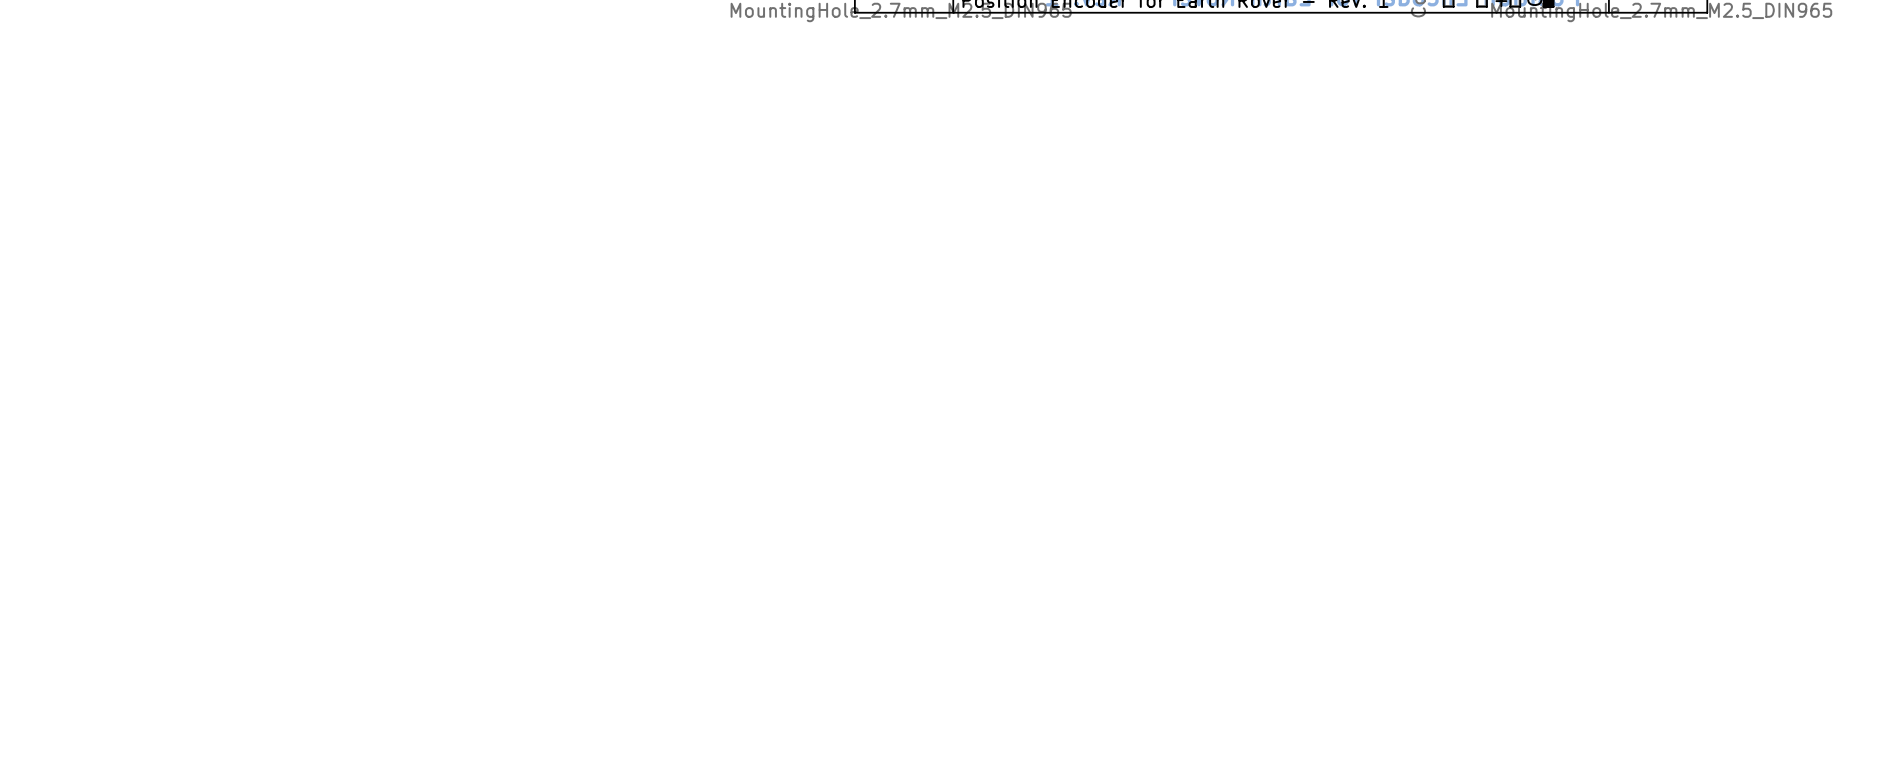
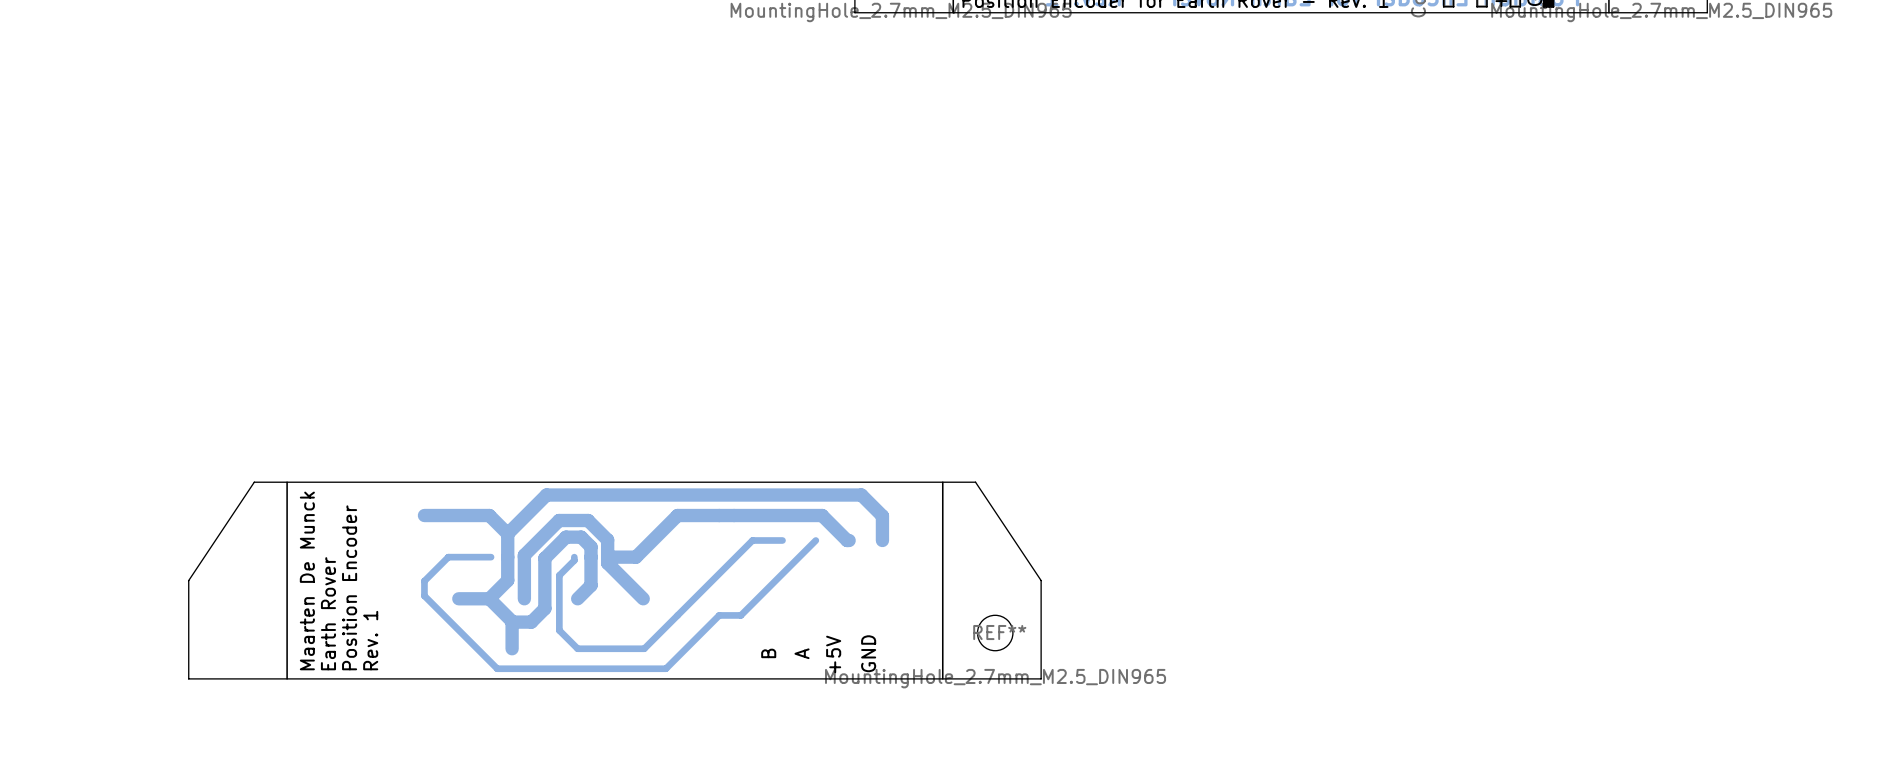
board edge: none -> (254, 482) (975, 482) (1041, 580) (1041, 678) (188, 678) (188, 580) (254, 482)
line: none -> (287, 482) (287, 678)
line: none -> (942, 482) (942, 678)
bottom track: none -> (424, 515) (489, 515) (507, 533)
bottom track: none -> (507, 533) (507, 580) (489, 598)
bottom track: none -> (507, 533) (546, 495) (861, 495) (882, 516) (882, 540)
bottom track: none -> (782, 540) (752, 540) (644, 648) (577, 648) (559, 630) (559, 575) (574, 560) (574, 557)
bottom track: none -> (815, 540) (740, 615) (719, 615) (665, 668) (497, 668) (424, 595) (424, 581) (448, 557) (491, 557)
bottom track: none -> (849, 540) (822, 515) (677, 515) (635, 557) (607, 557) (607, 563) (643, 598)
bottom track: none -> (607, 557) (607, 540) (588, 520) (559, 520) (524, 555) (524, 598)
text: none -> Maarten De Munck (307, 580)
text: none -> Position Encoder (349, 587)
bottom track: none -> (458, 598) (489, 598)
bottom track: none -> (489, 598) (512, 622)
bottom track: none -> (577, 598) (590, 585) (590, 546) (581, 537) (566, 537) (544, 558) (544, 608) (531, 622) (512, 622)
text: none -> Earth Rover (328, 613)
bottom track: none -> (512, 622) (512, 648)
REF**: none -> MountingHole_2.7mm_M2.5_DIN965 (995, 633)
text: none -> Rev. 1 (370, 640)
text: none -> B (768, 653)
text: none -> A (802, 653)
text: none -> GND (868, 653)
text: none -> +5V (833, 654)

